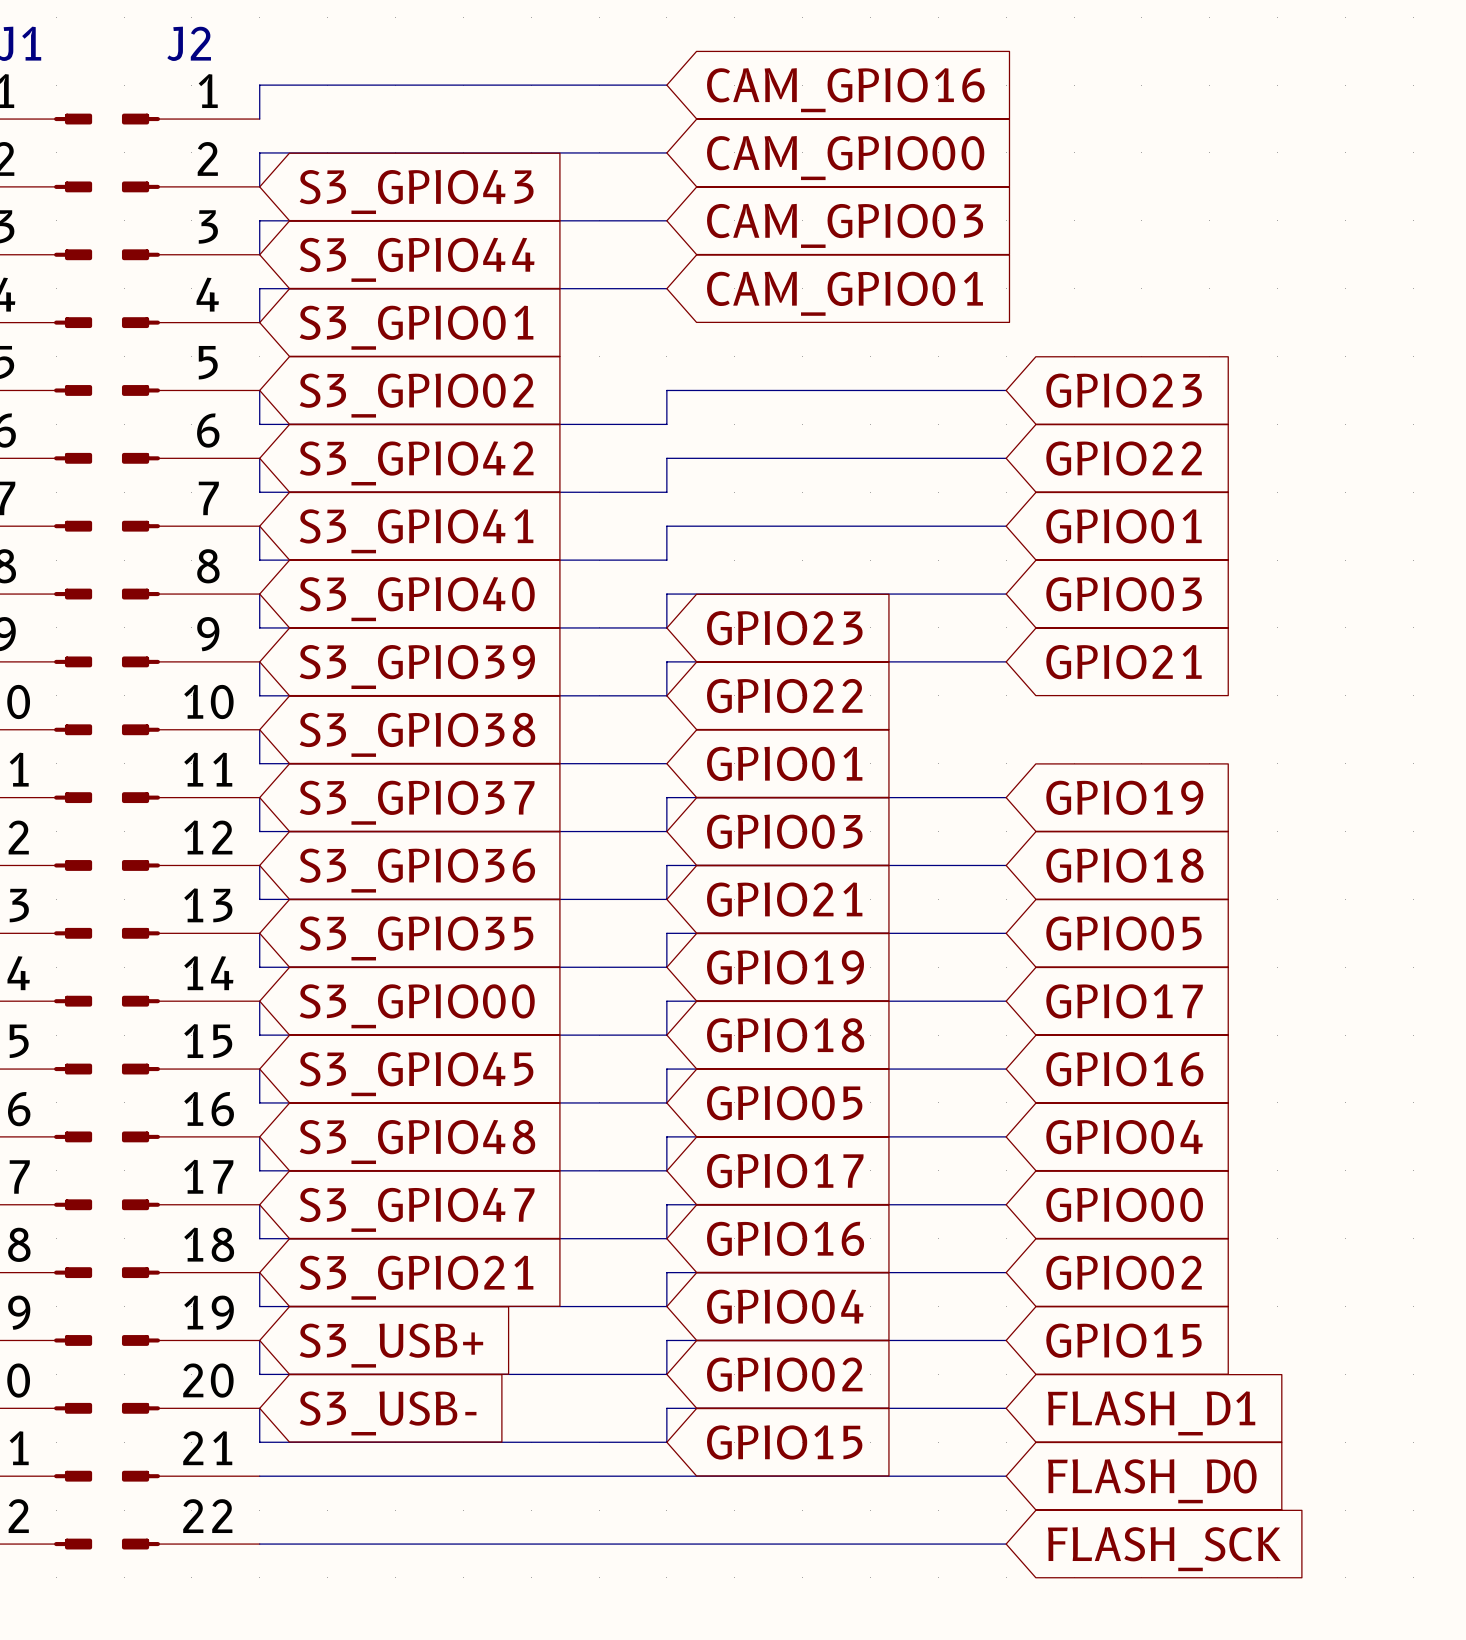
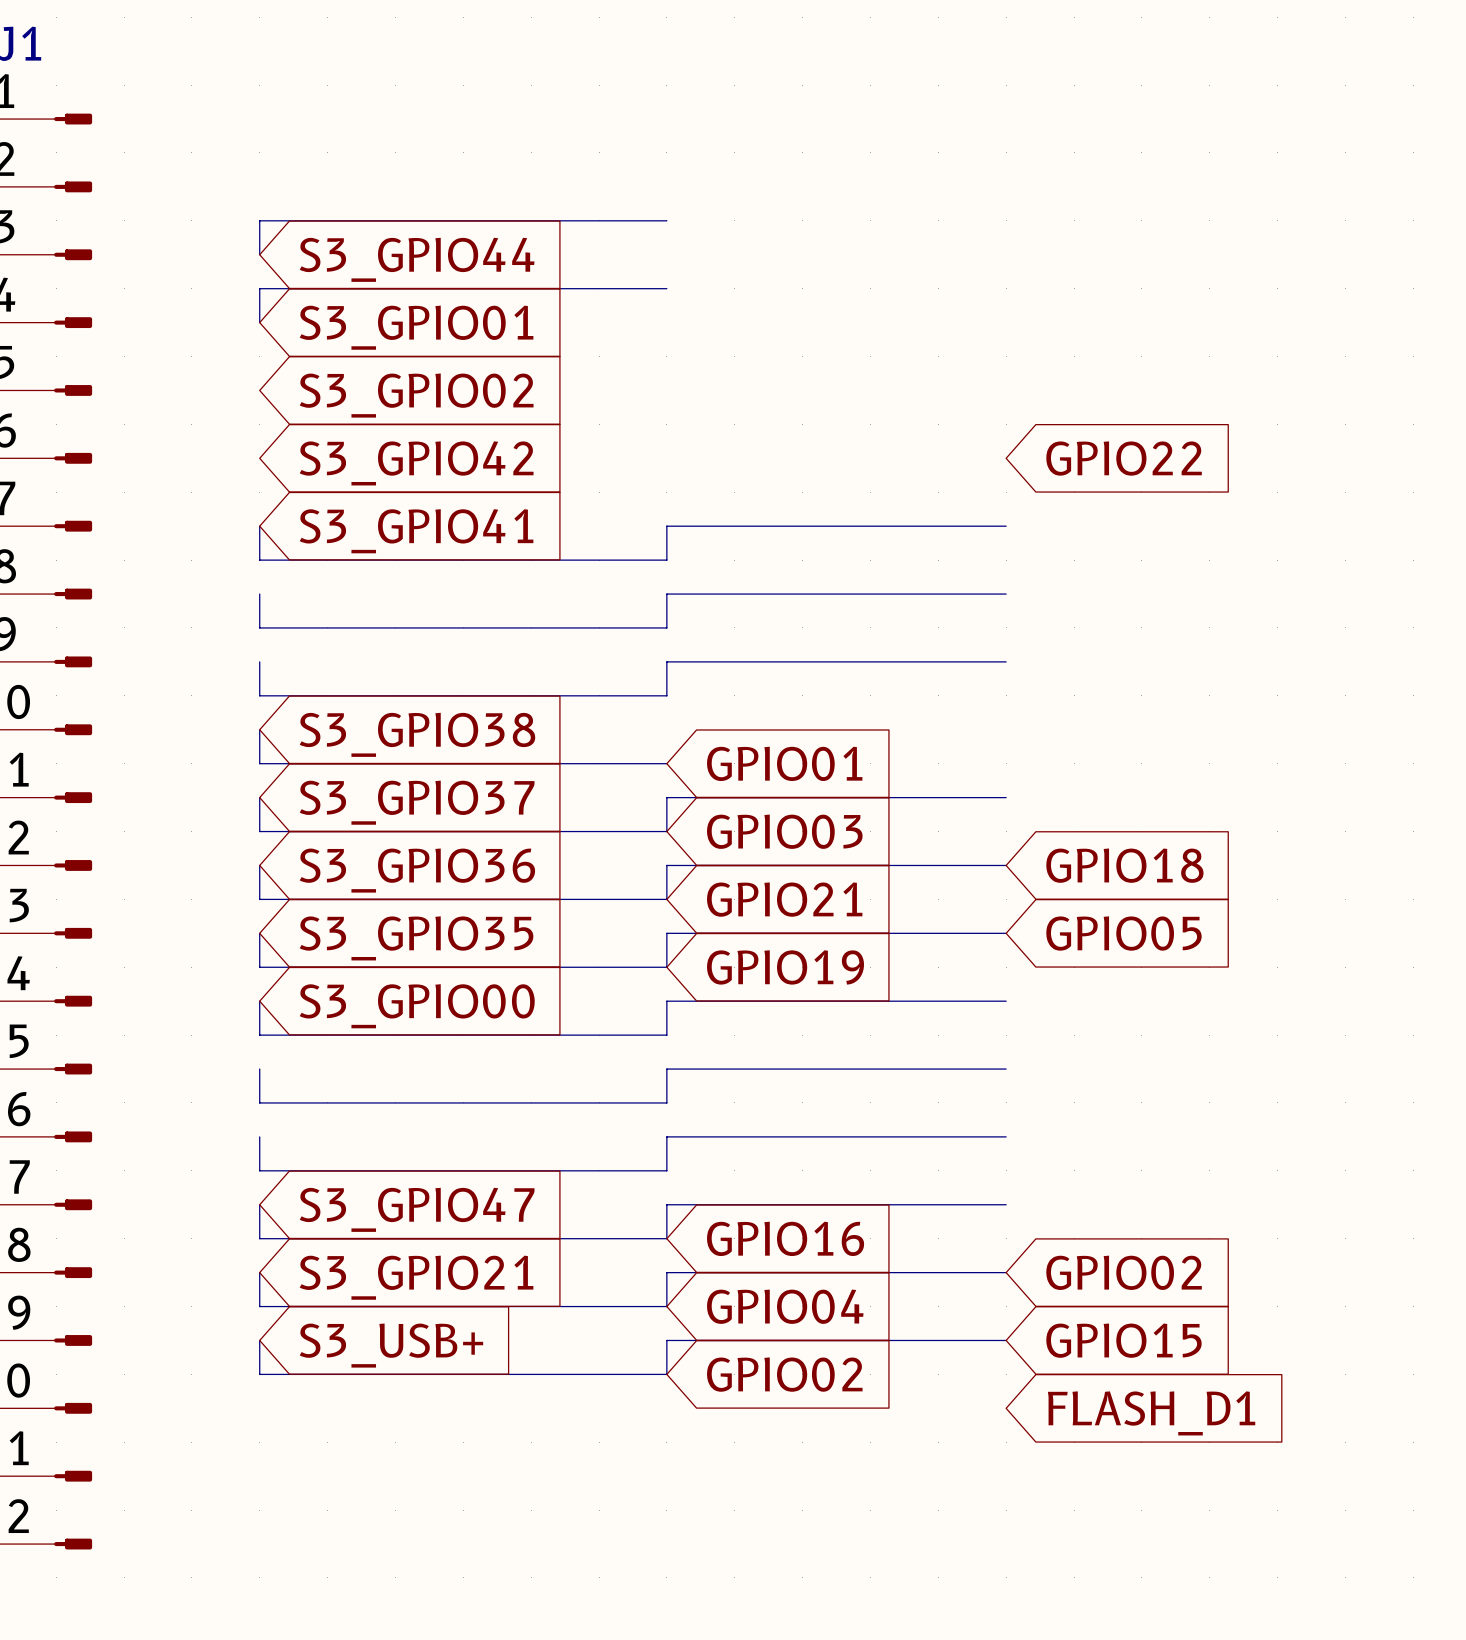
wire: (666, 85) (259, 85) (259, 119) -> none
global label: CAM_GPIO16 (845, 90) -> none
wire: (666, 152) (259, 152) (259, 186) -> none
global label: CAM_GPIO00 (845, 158) -> none
global label: S3_GPIO43 (416, 191) -> none
global label: CAM_GPIO03 (845, 225) -> none
global label: CAM_GPIO01 (844, 293) -> none
wire: (259, 390) (259, 424) (666, 424) (666, 390) (1006, 390) -> none
global label: GPIO23 (1124, 390) -> none
wire: (259, 458) (259, 492) (666, 492) (666, 458) (1006, 458) -> none
global label: GPIO01 (1123, 526) -> none
global label: GPIO03 (1124, 594) -> none
global label: S3_GPIO40 (417, 599) -> none
global label: GPIO23 (784, 628) -> none
global label: GPIO21 (1123, 662) -> none
global label: S3_GPIO39 (417, 666) -> none
global label: GPIO22 (784, 696) -> none
global label: GPIO19 (1124, 797) -> none
J2: (190, 831) -> none
global label: GPIO17 (1124, 1001) -> none
global label: GPIO18 (785, 1035) -> none
global label: GPIO16 (1124, 1069) -> none
global label: S3_GPIO45 (416, 1074) -> none
global label: GPIO05 (784, 1103) -> none
global label: GPIO04 (1124, 1137) -> none
global label: S3_GPIO48 (417, 1141) -> none
global label: GPIO17 (785, 1171) -> none
global label: GPIO00 (1124, 1204) -> none
wire: (259, 1408) (259, 1442) (666, 1442) (666, 1408) (1006, 1408) -> none
global label: S3_USB- (388, 1413) -> none
global label: GPIO15 (784, 1442) -> none
wire: (259, 1476) (1006, 1476) -> none
global label: FLASH_D0 (1152, 1481) -> none
wire: (259, 1544) (1006, 1544) -> none
global label: FLASH_SCK (1164, 1549) -> none

